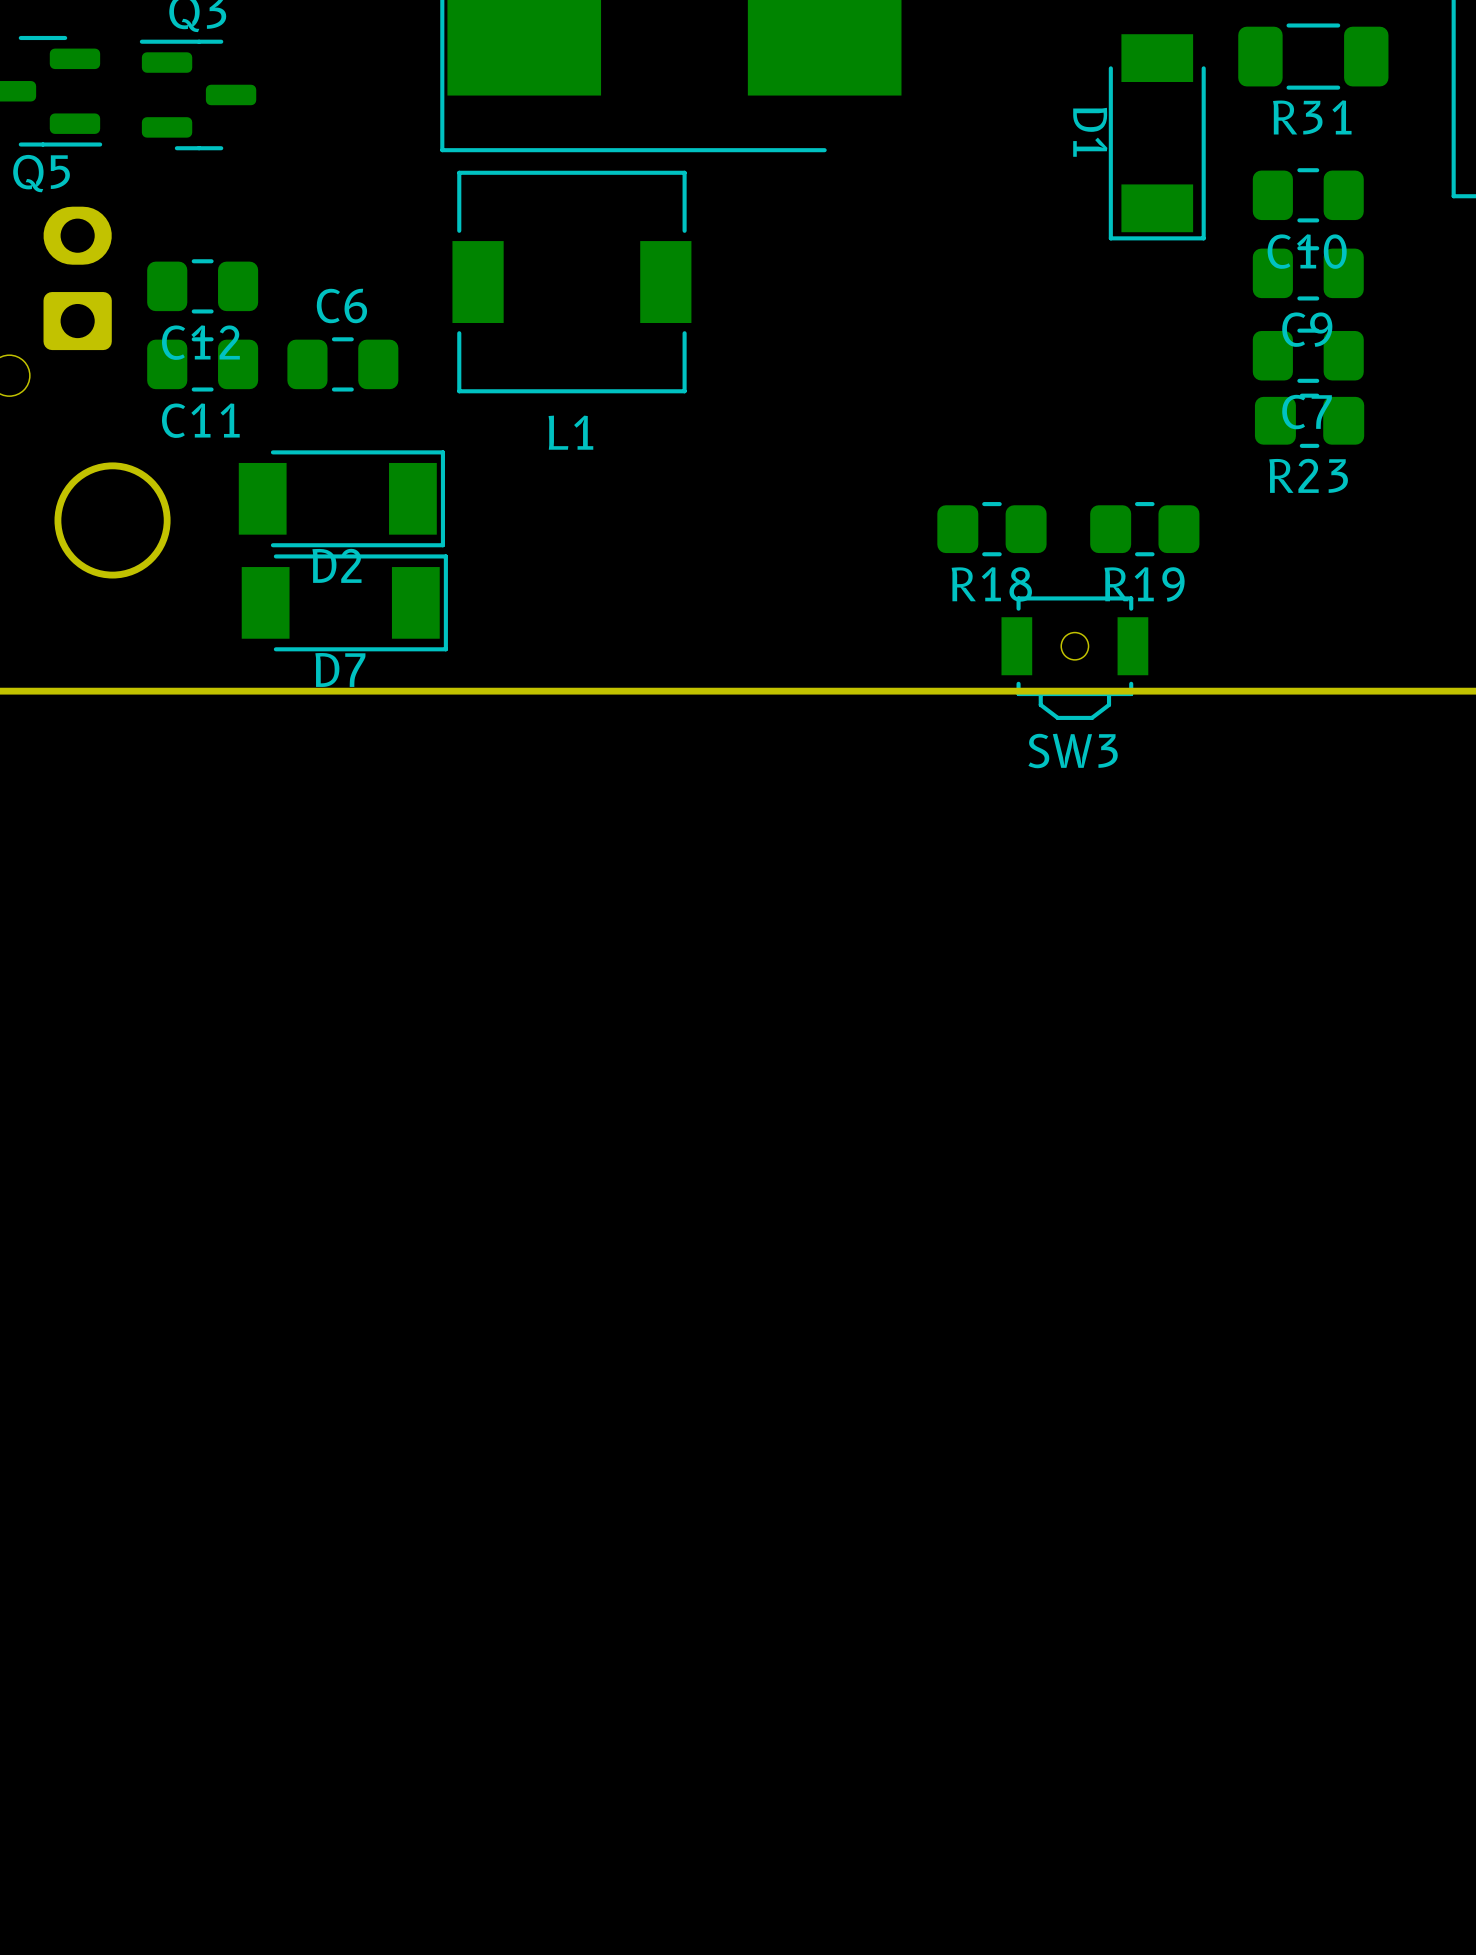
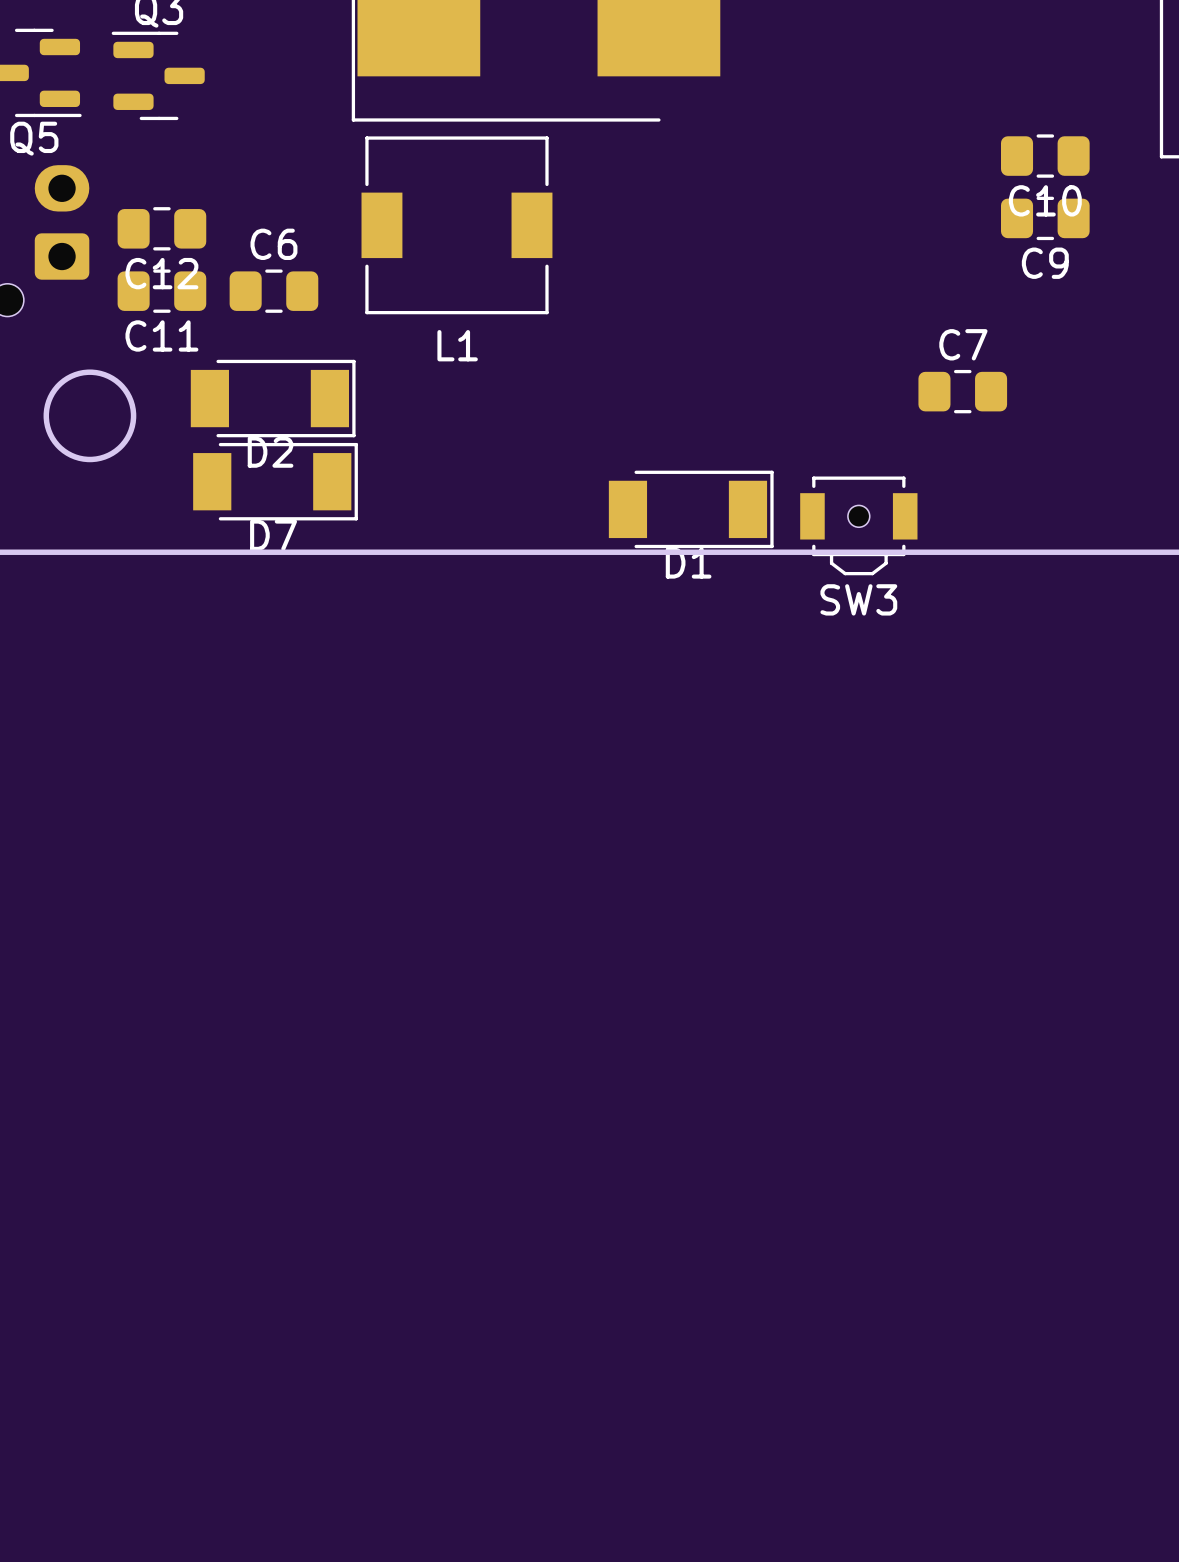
R31: (1313, 56) -> none
D1 rotation: 0° (1157, 137) -> 90° counterclockwise (691, 509)
D1 position: (1157, 137) -> (691, 509)
C7 position: (1308, 355) -> (962, 391)
C7 name position: C7 (1307, 412) -> C7 (963, 344)
R23: (1309, 420) -> none
R18: (991, 529) -> none
R19: (1144, 529) -> none

